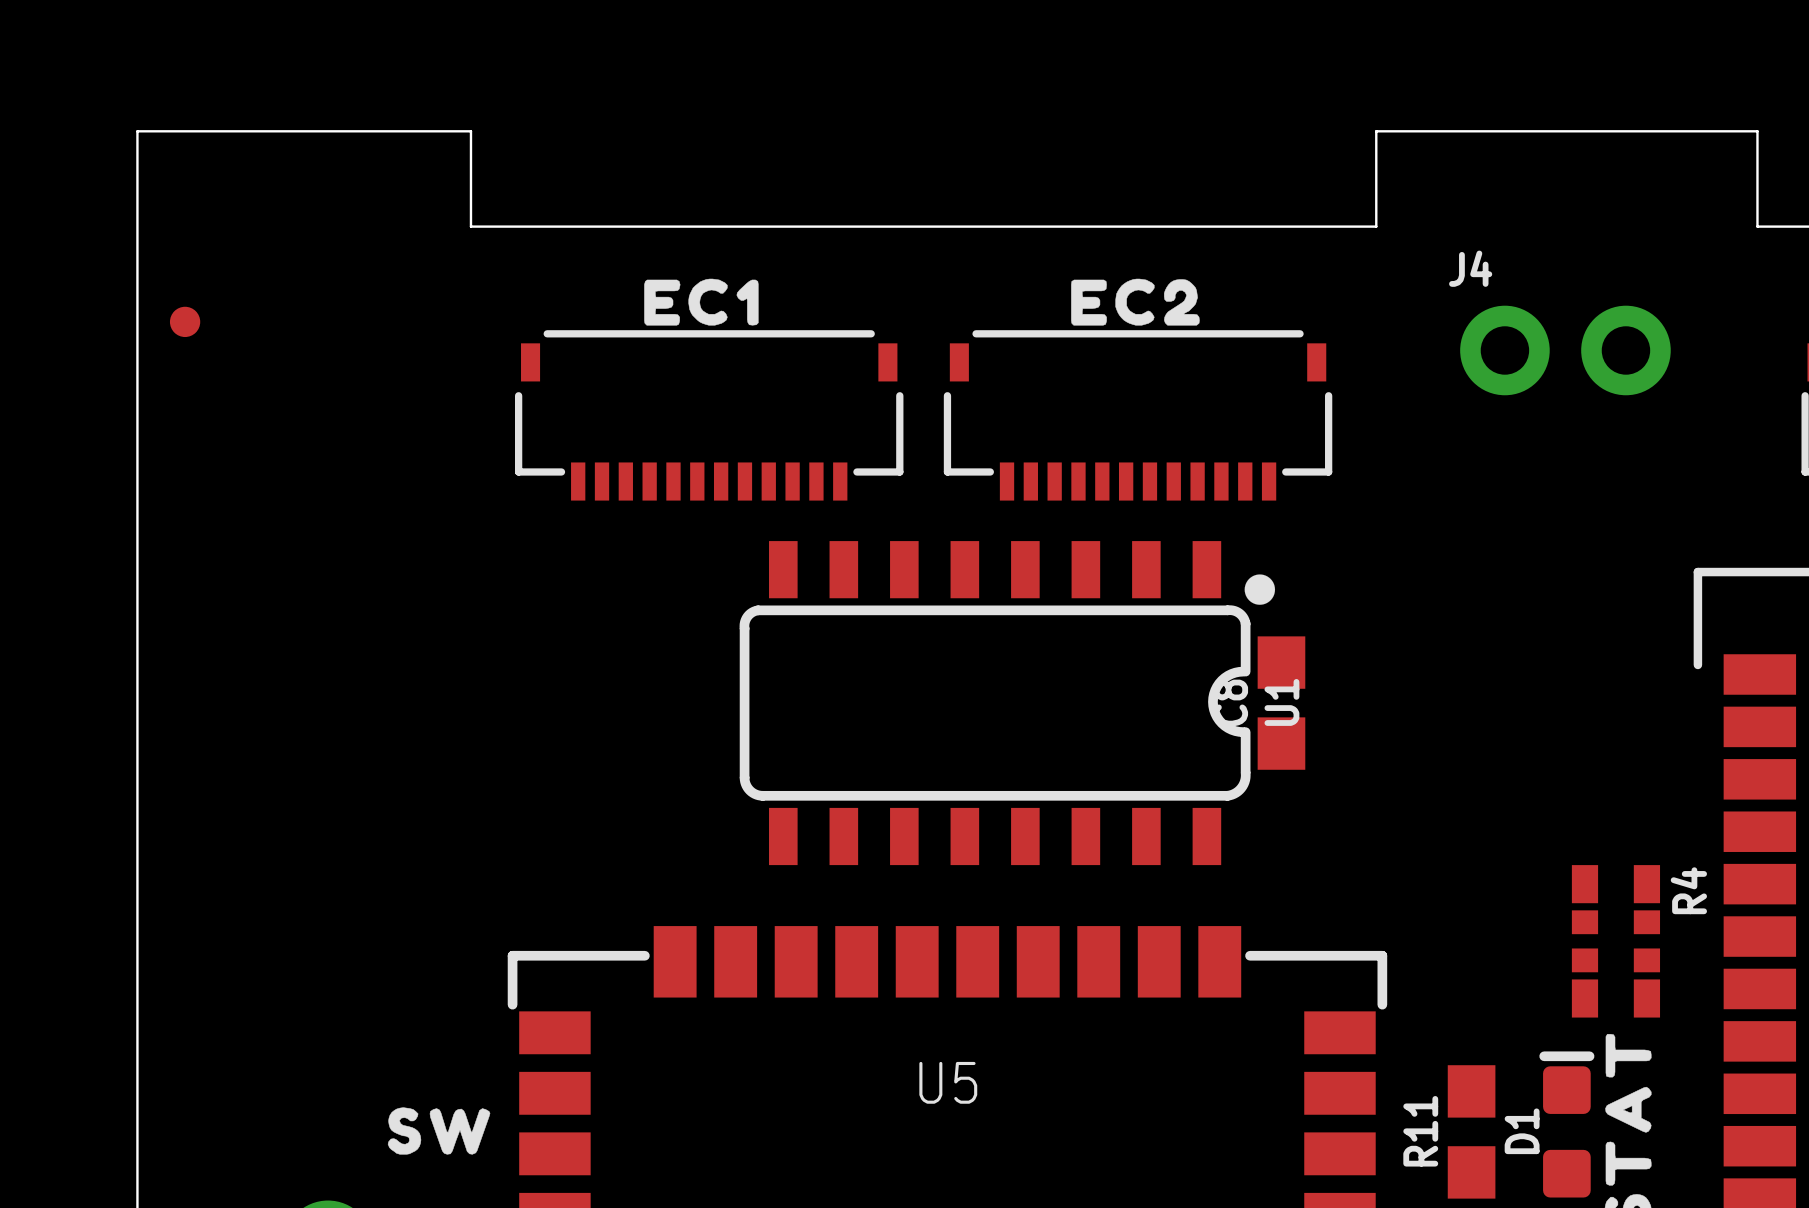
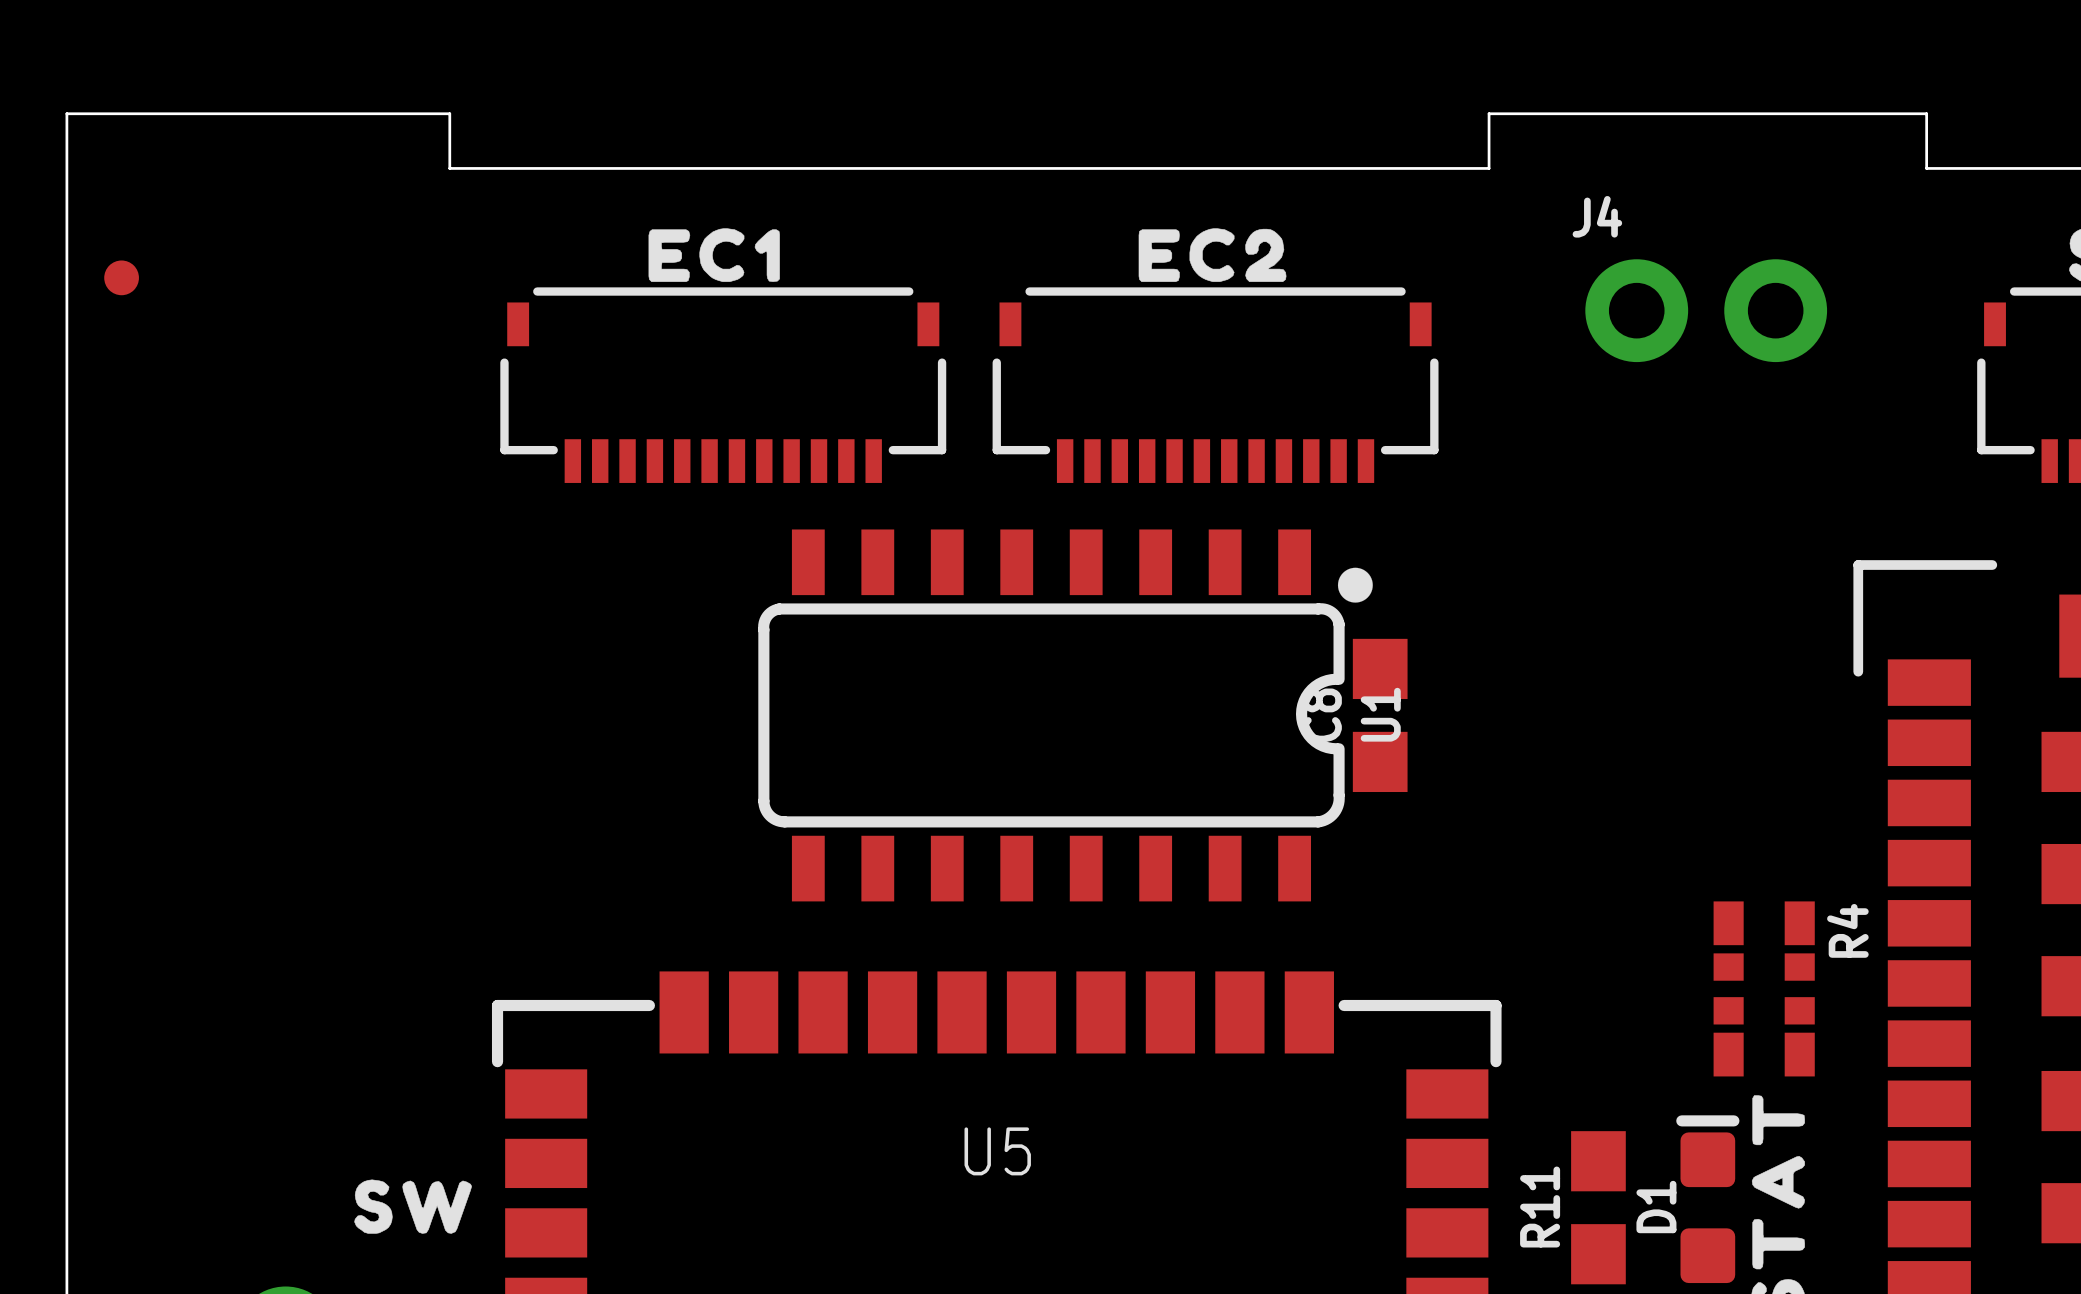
board edge: (137, 178) (137, 131) (470, 131) (470, 178) -> (66, 113) (449, 113)
board edge: (1376, 178) (1376, 131) (1757, 131) (1757, 178) -> (1489, 113) (1926, 113)

